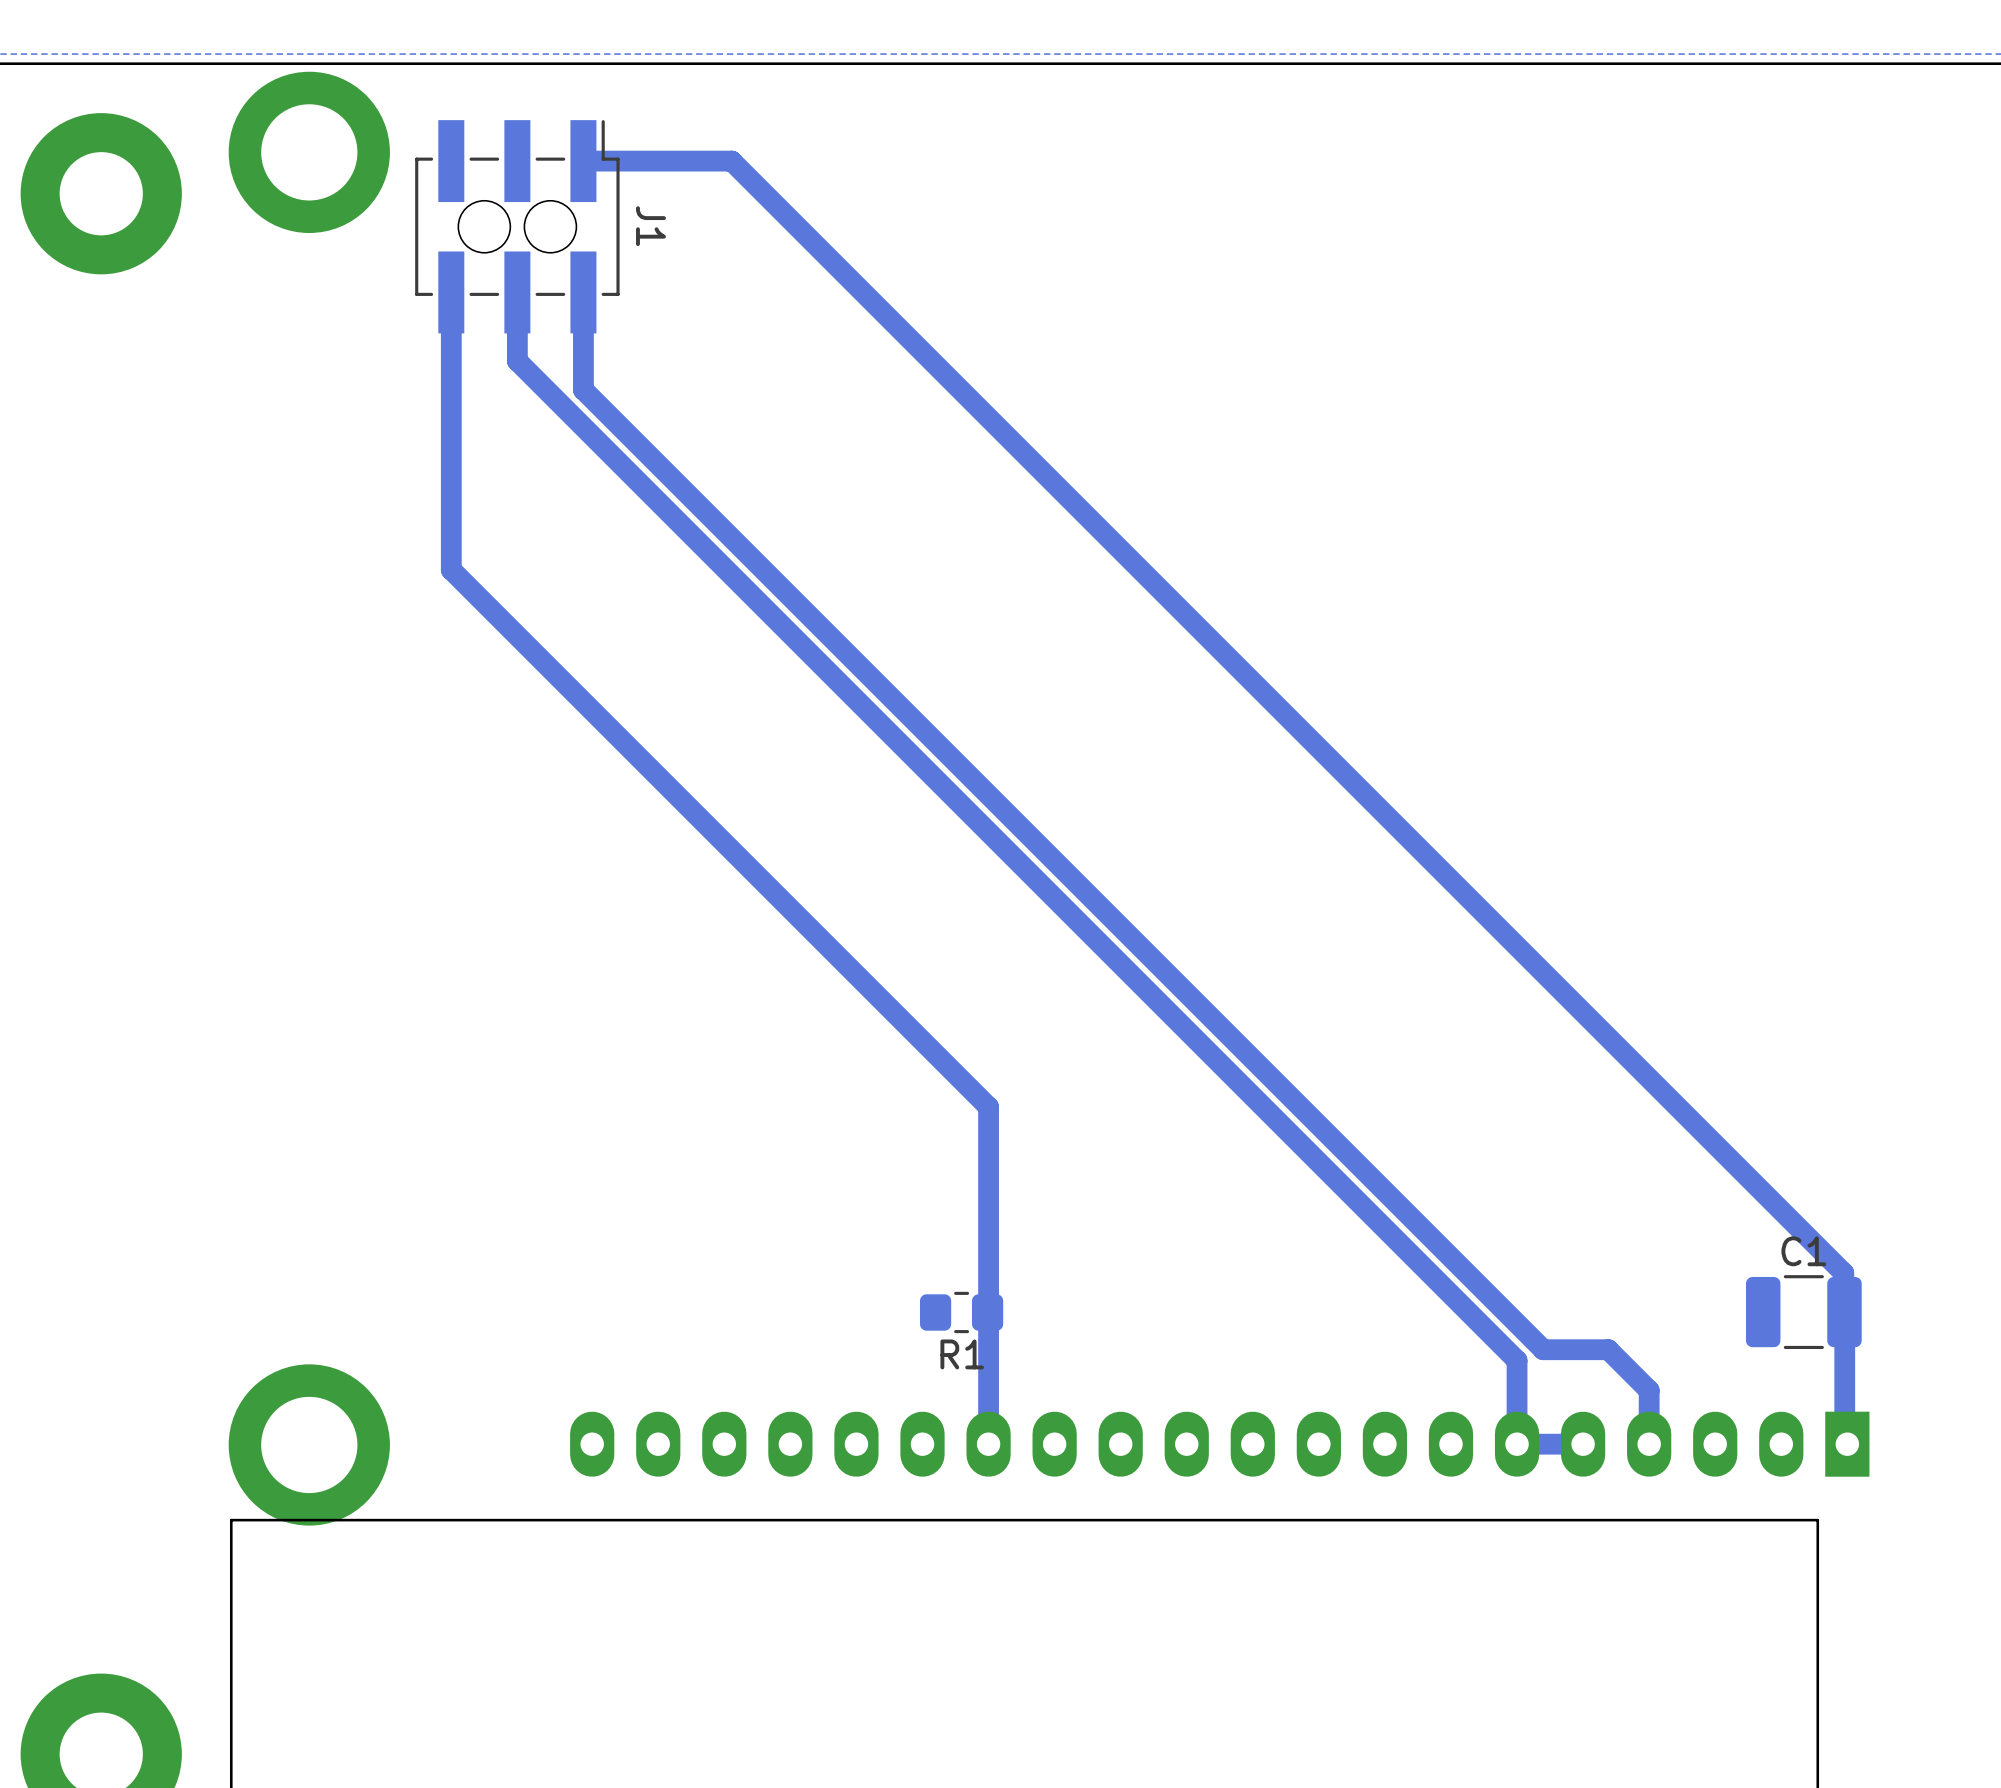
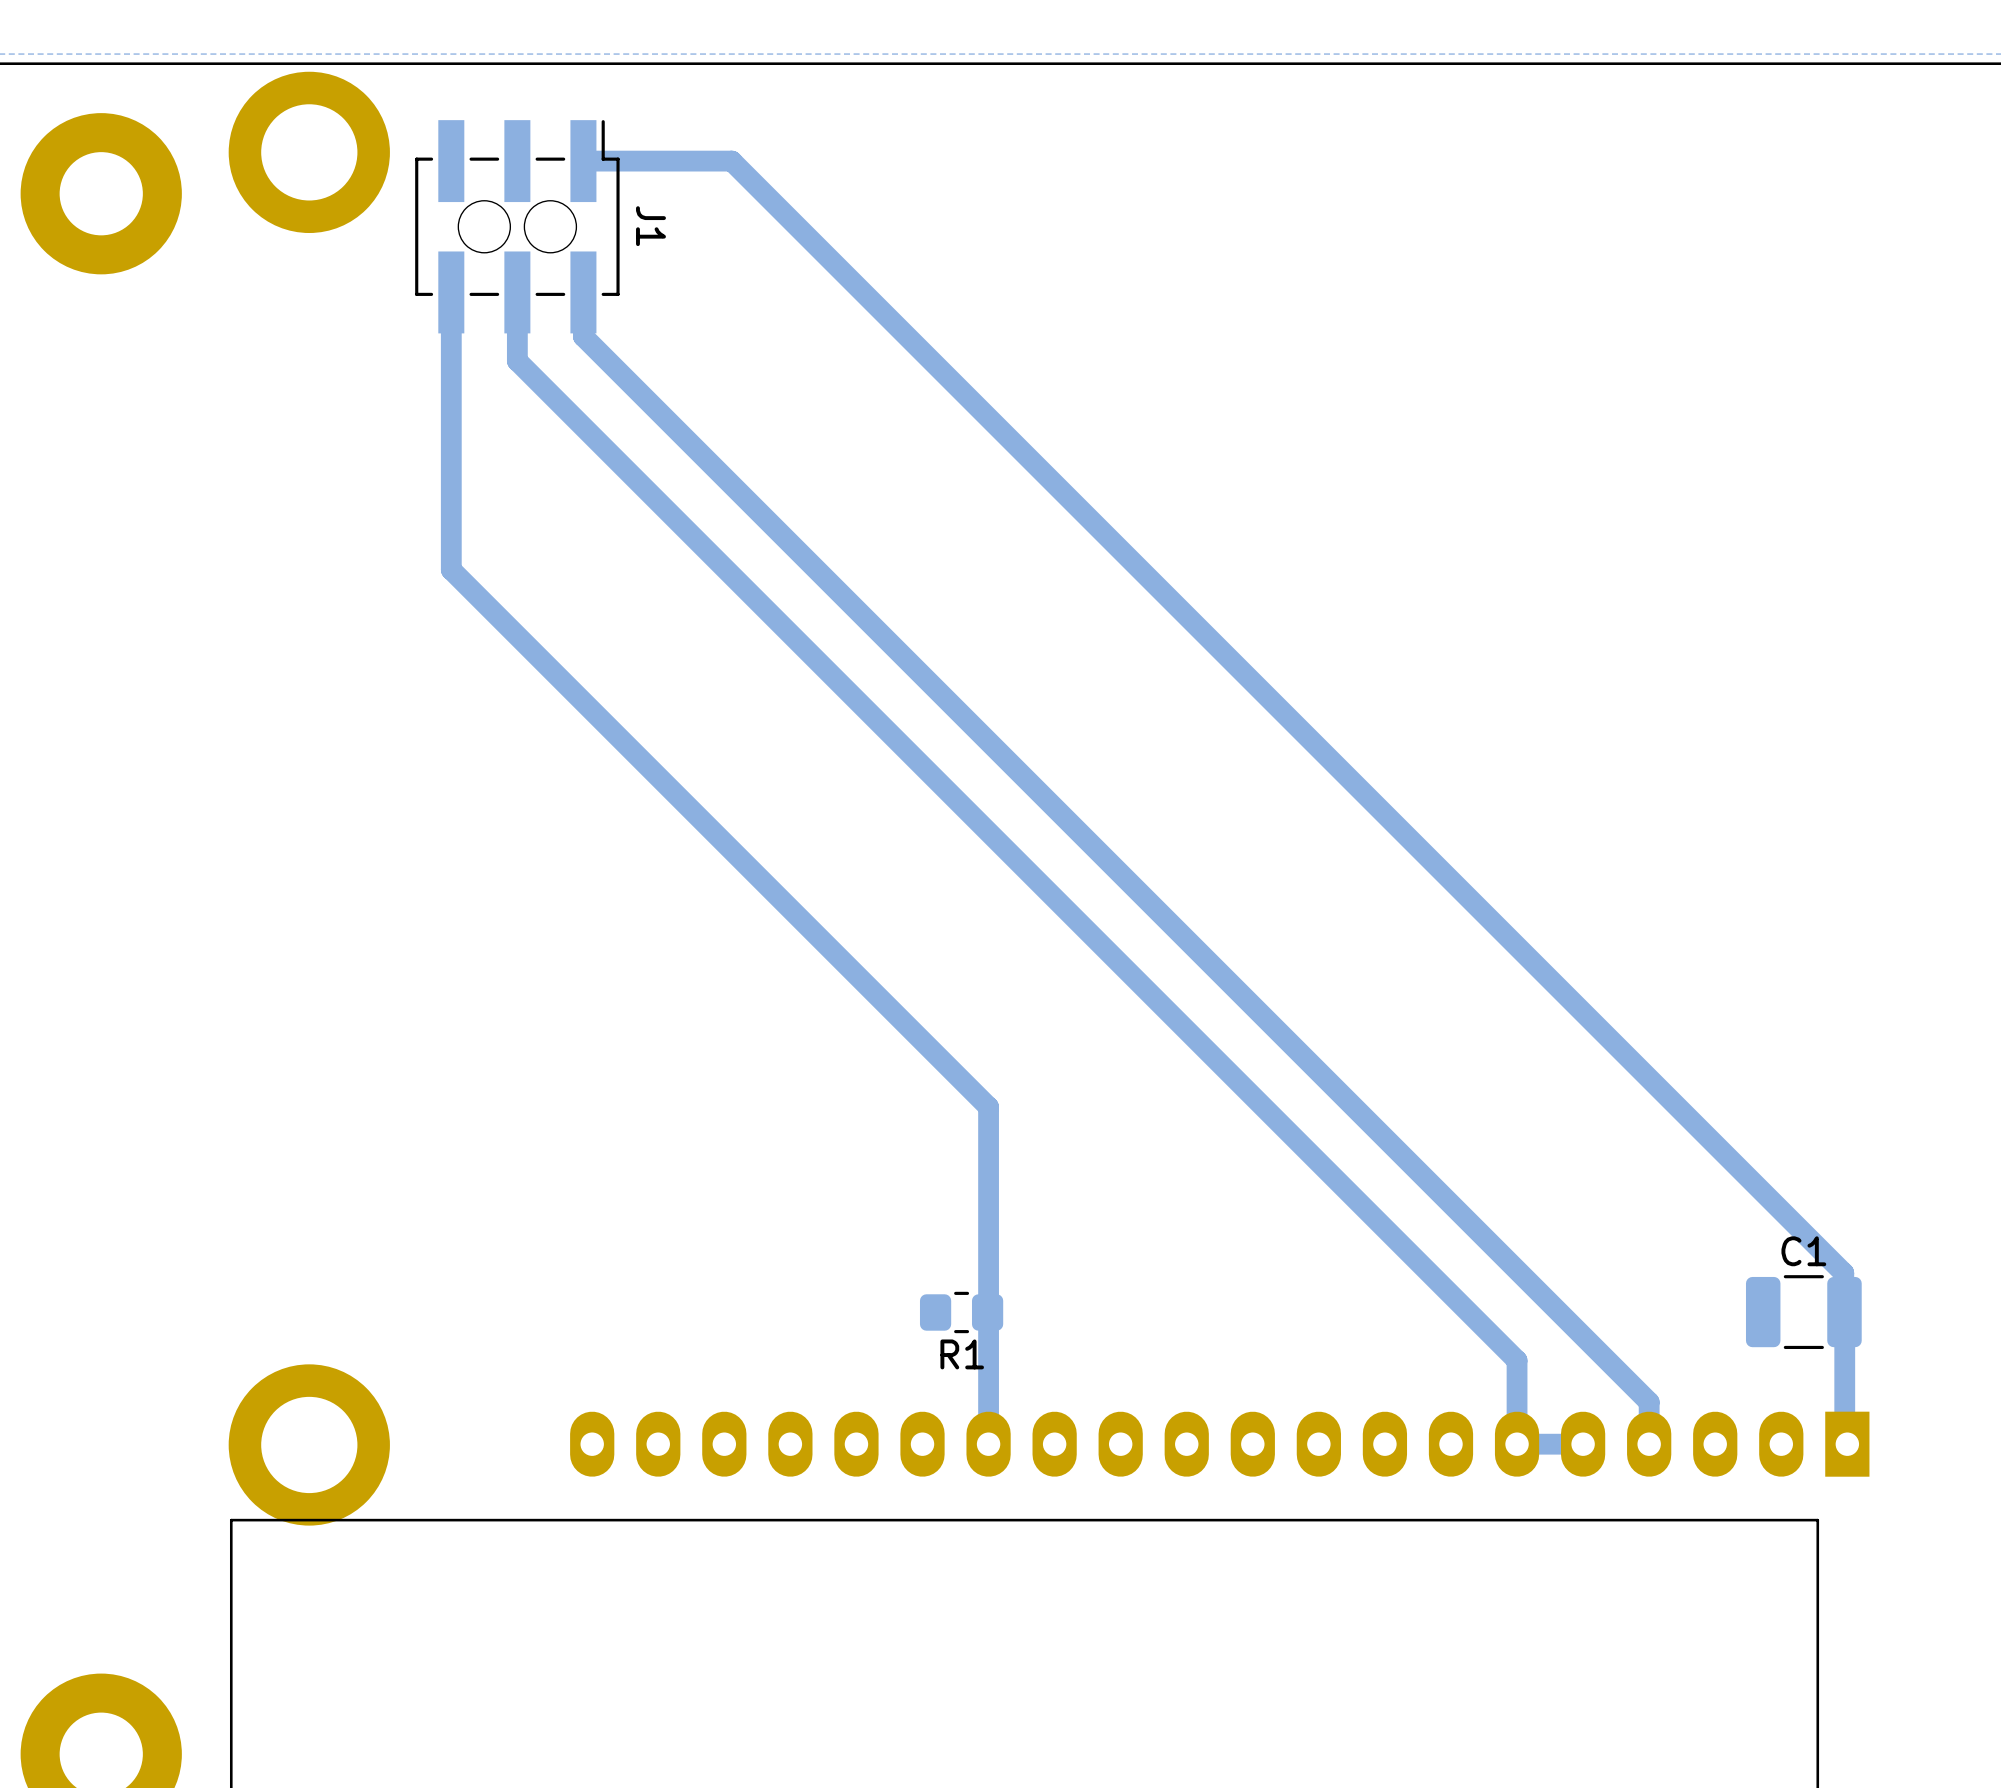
track: (583, 336) (583, 389) (1543, 1349) (1608, 1349) (1649, 1390) (1649, 1402) -> (583, 336) (1649, 1402)

